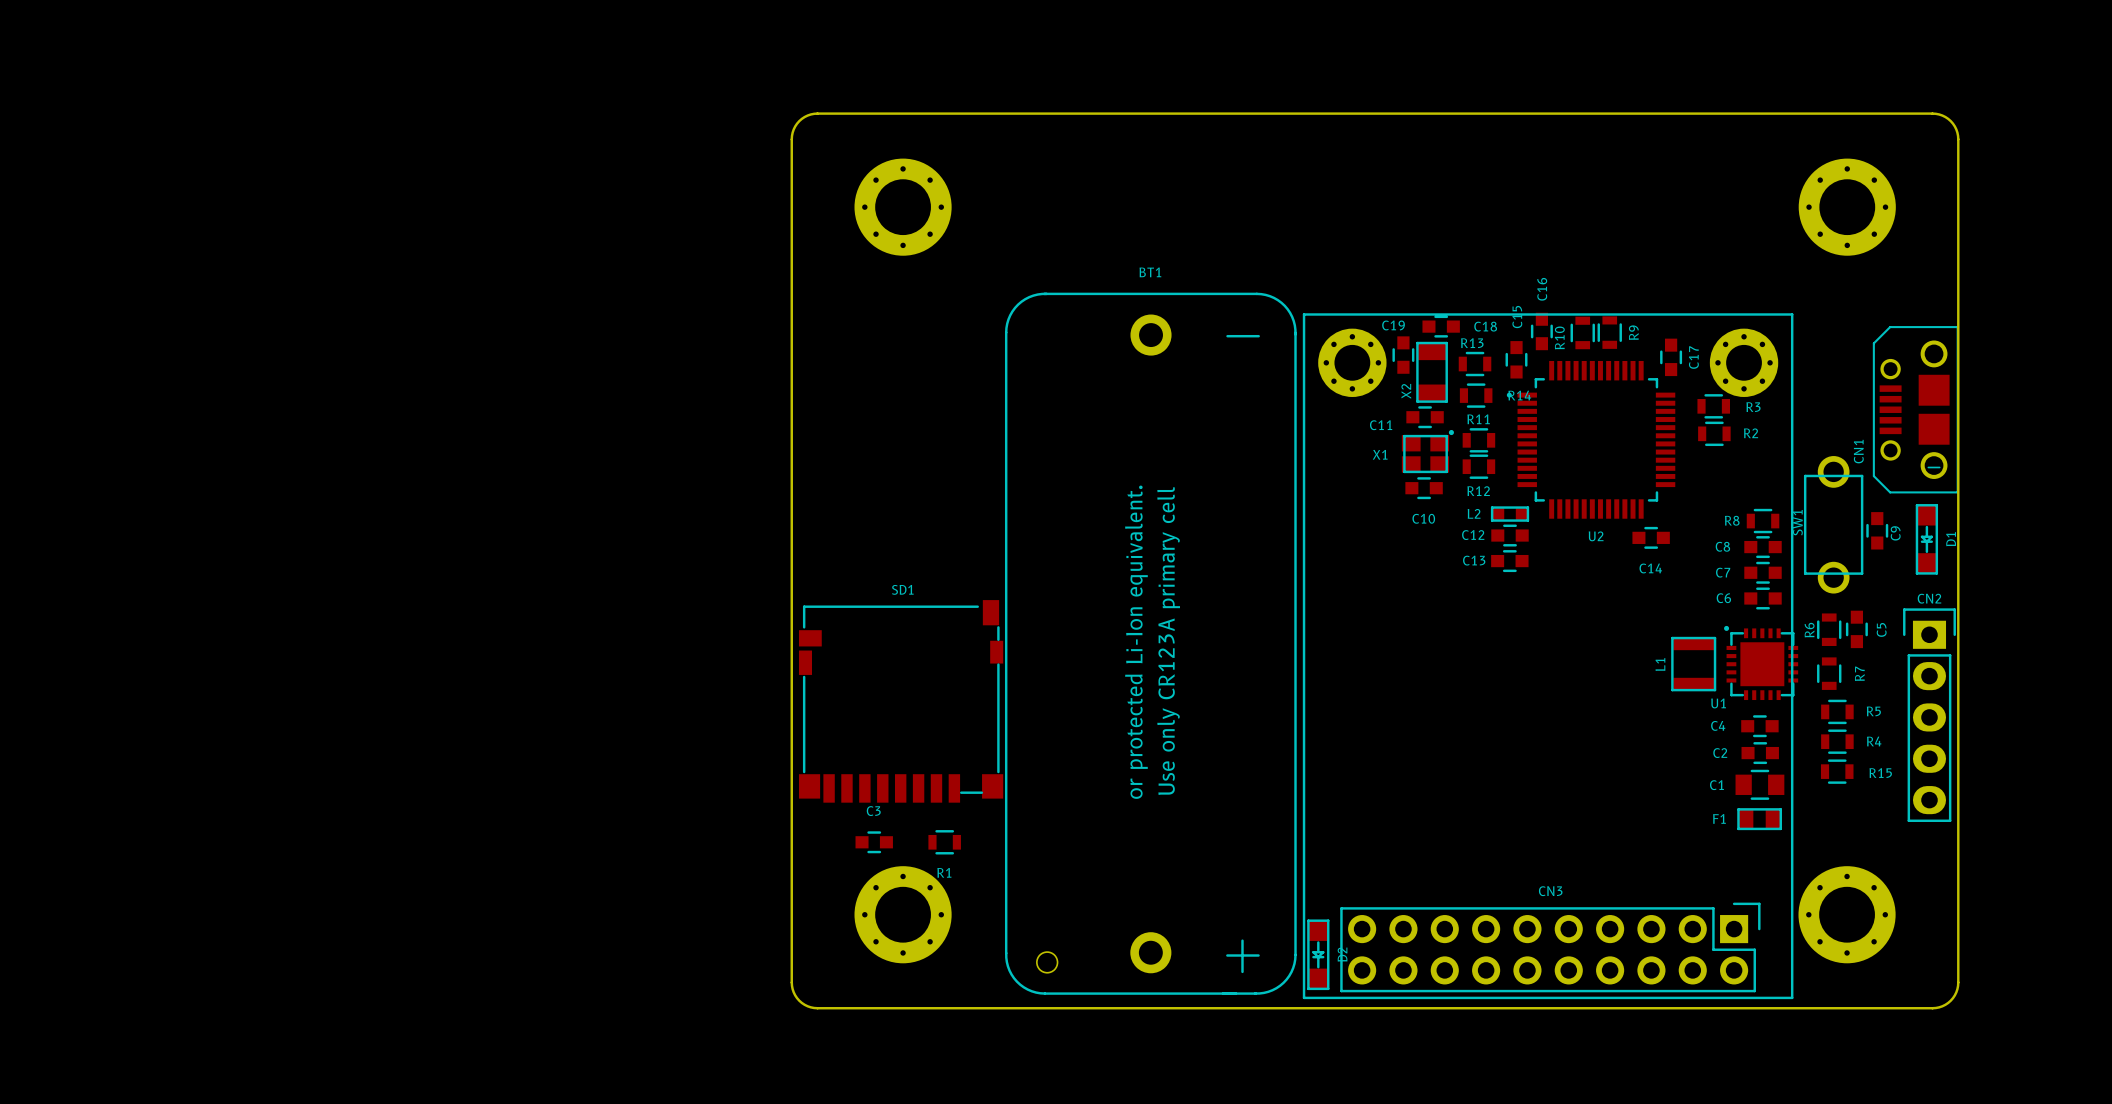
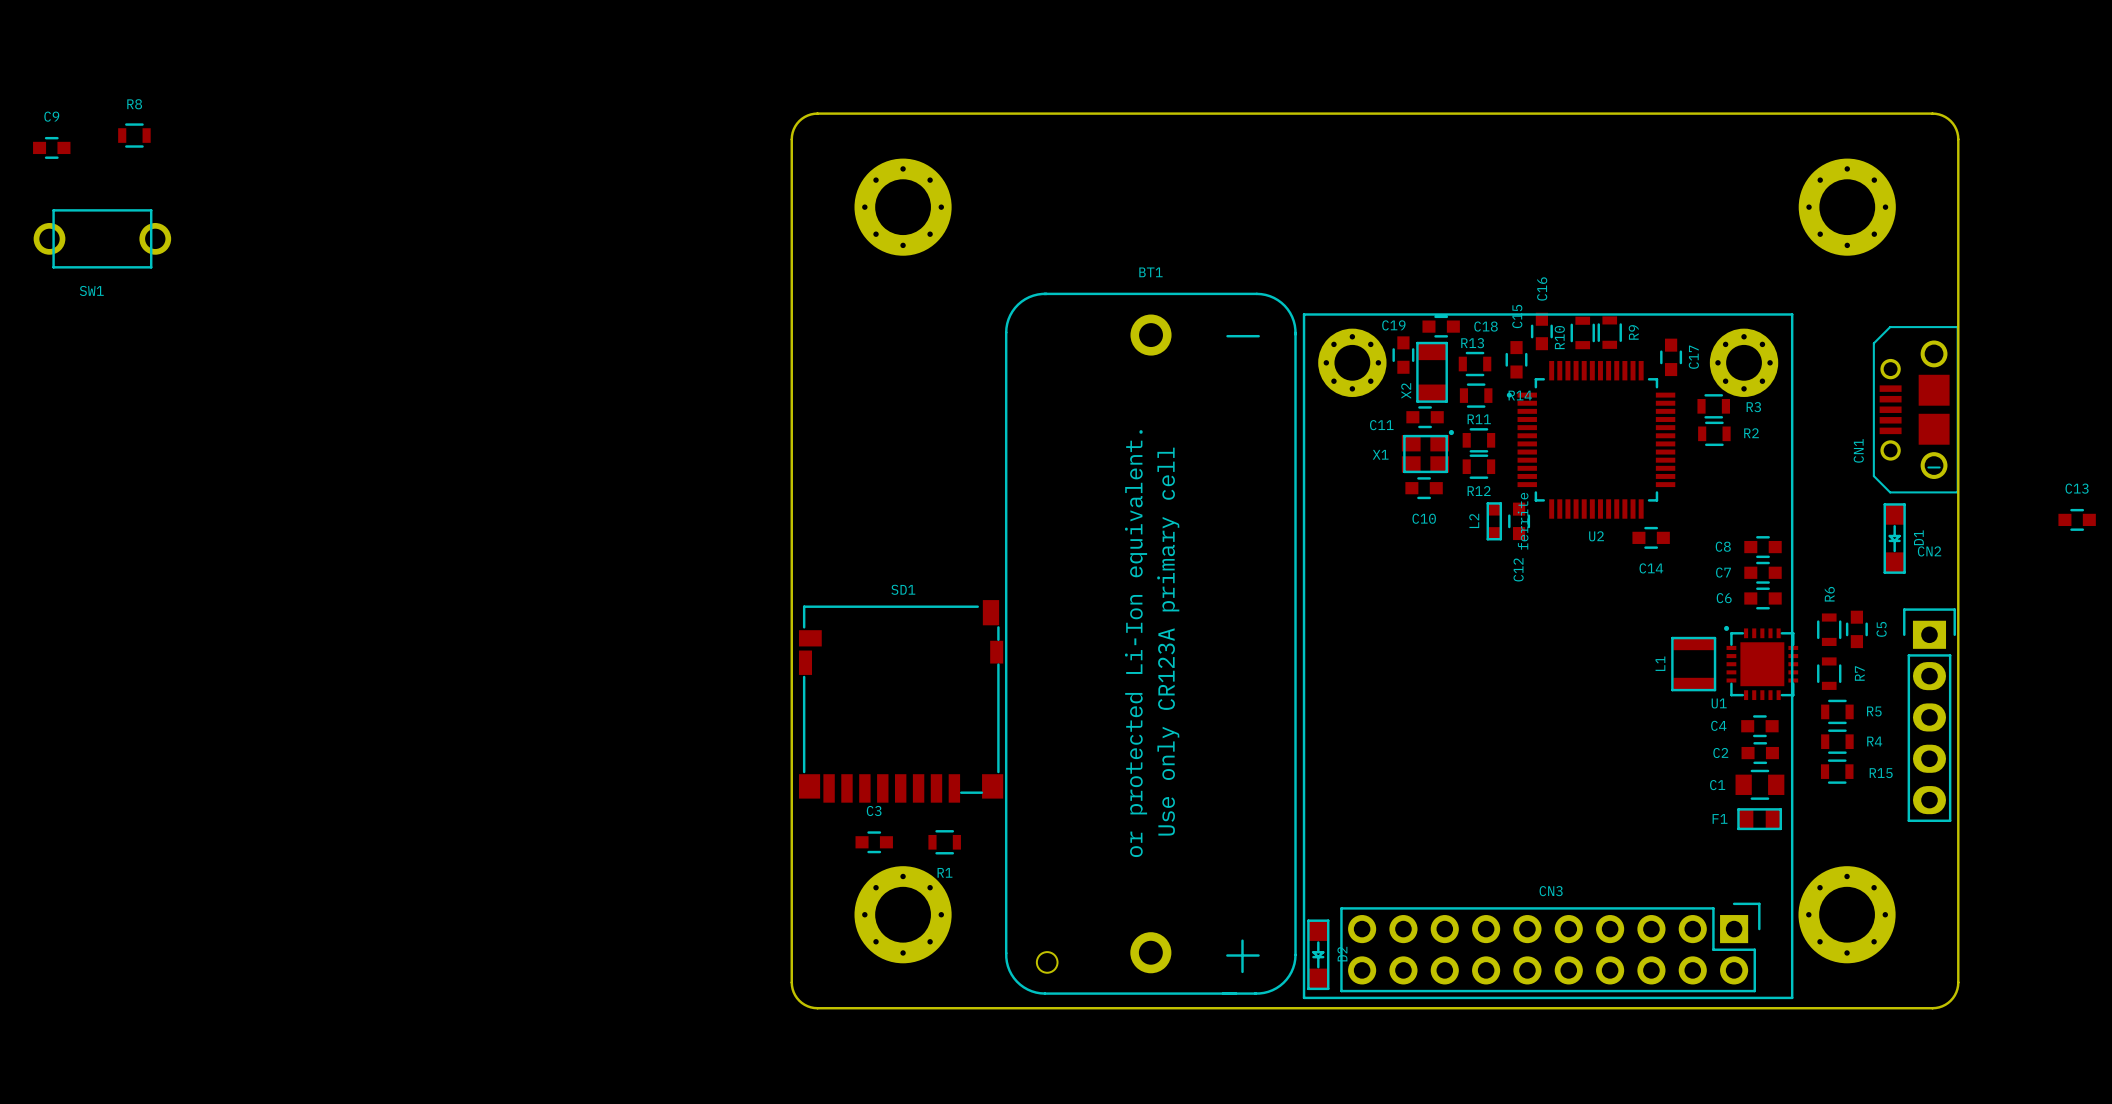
L2 rotation: 0° (1510, 514) -> 90° clockwise (1494, 521)
R8 name position: R8 (1732, 520) -> R8 (134, 104)
L2 value: none -> ferrite (1523, 521)
R8 position: (1763, 521) -> (134, 135)
SW1 name position: SW1 (1797, 522) -> SW1 (91, 290)
SW1 rotation: 0° (1833, 524) -> 90° clockwise (102, 238)
SW1 position: (1833, 524) -> (102, 238)
C9 rotation: 0° (1877, 530) -> 90° clockwise (51, 147)
C9 position: (1877, 530) -> (51, 147)
C9 name position: C9 (1895, 533) -> C9 (51, 116)
C12 name position: C12 (1473, 535) -> C12 (1518, 569)
C12 rotation: 0° (1510, 535) -> 90° clockwise (1519, 521)
D1 position: (1926, 539) -> (1894, 538)
C13 name position: C13 (1474, 560) -> C13 (2077, 488)
C13 position: (1509, 561) -> (2077, 519)
CN2 name position: CN2 (1929, 598) -> CN2 (1929, 551)
R6 name position: R6 (1809, 630) -> R6 (1829, 594)

